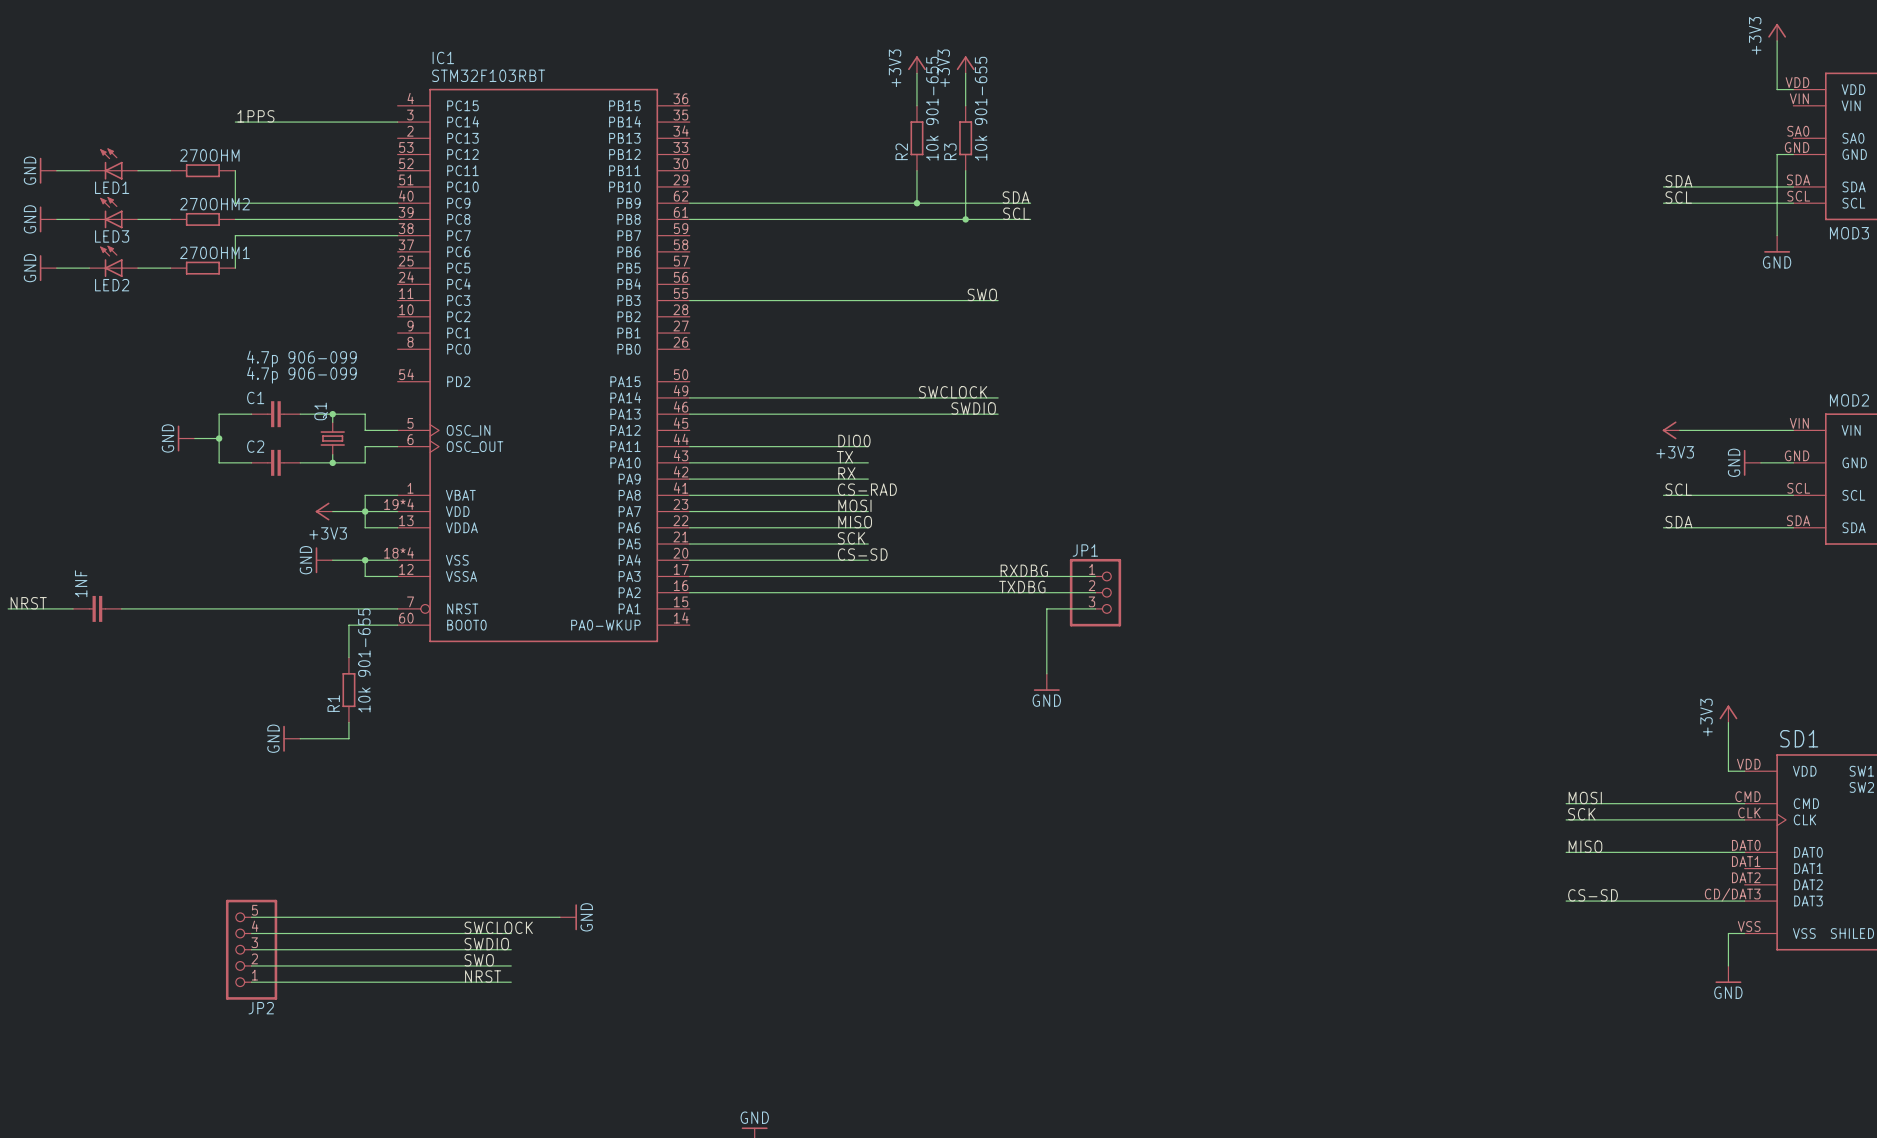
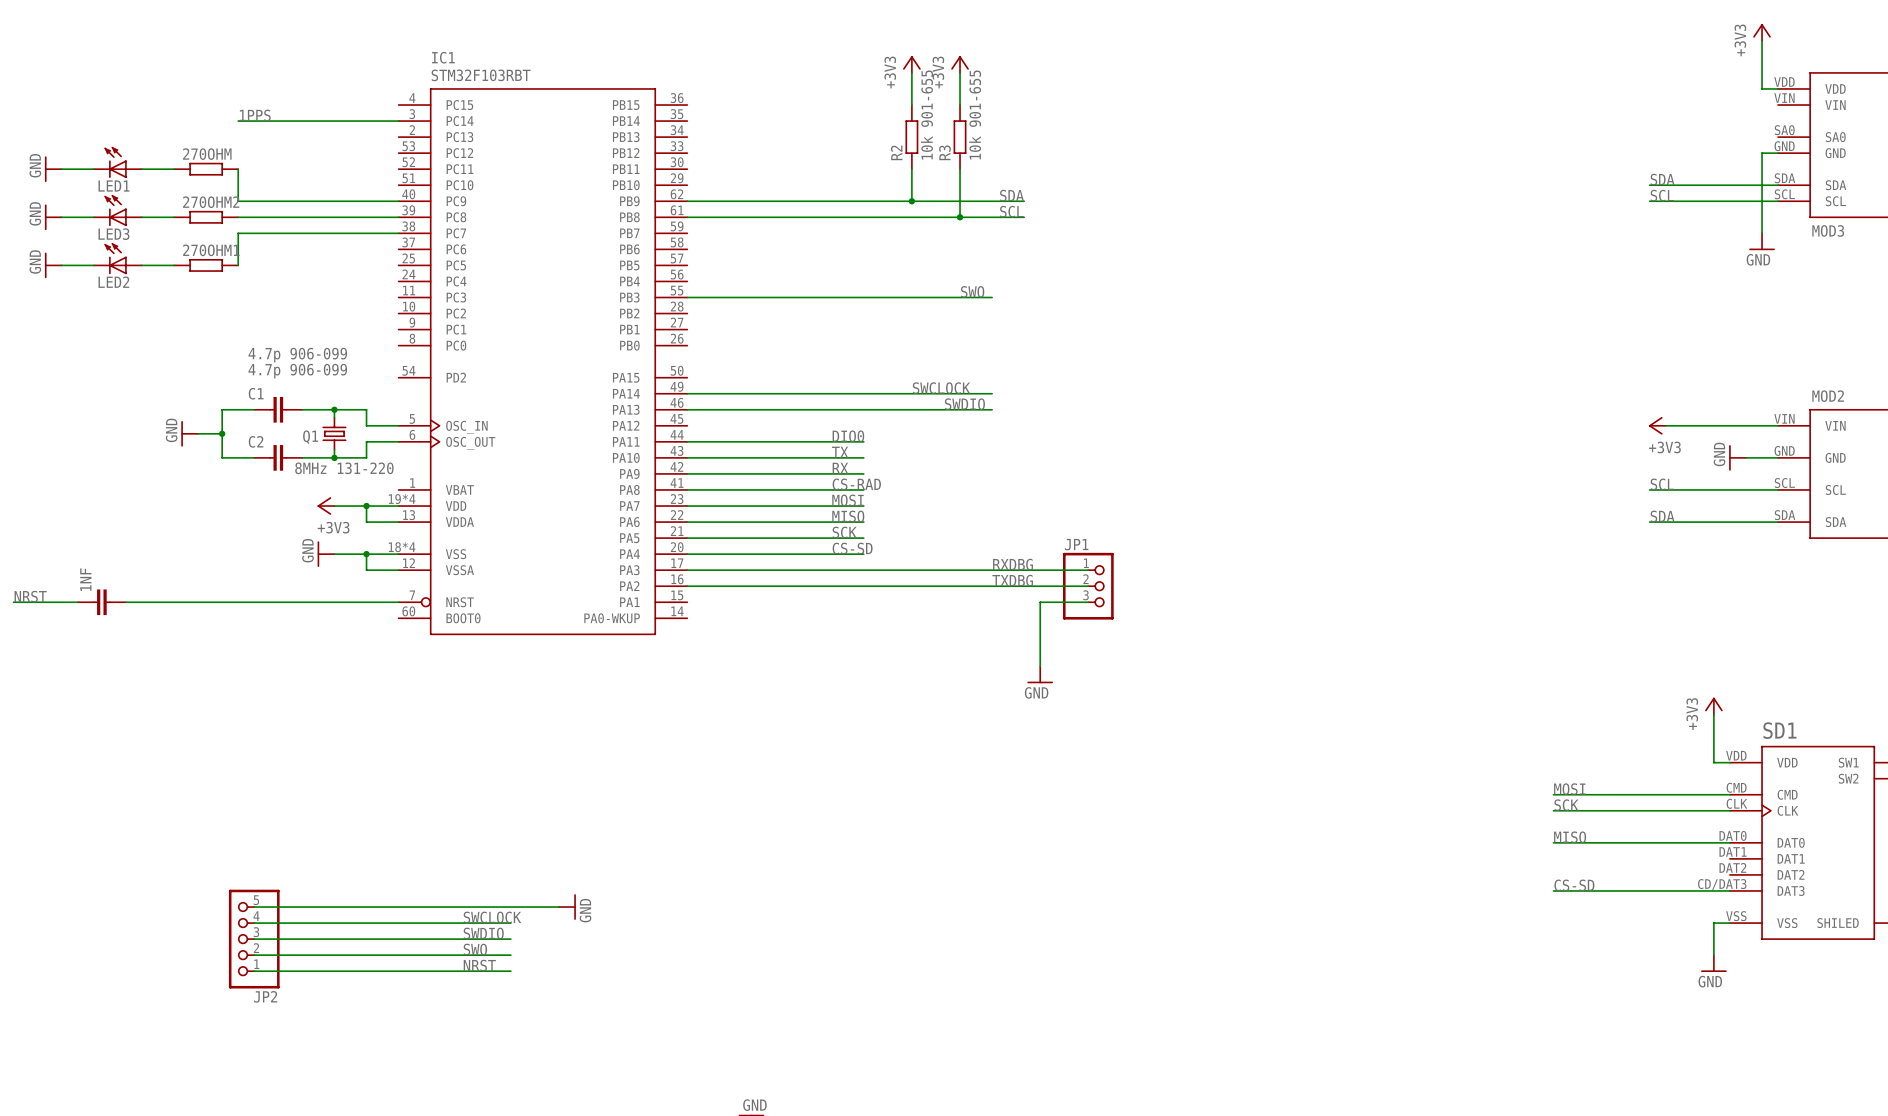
Q1 name rotation: 0° (321, 411) -> 90° clockwise (310, 437)
Q1 name position: Q1 (321, 411) -> Q1 (310, 437)
Q1 value: none -> 8MHz 131-220 (344, 468)
wire: (397, 495) (365, 495) (365, 511) -> none
wire: (397, 625) (348, 625) (348, 657) -> none
R1: 10k 901-655 (348, 690) -> none
wire: (348, 722) (348, 738) (300, 738) -> none
power symbol: GND (291, 738) -> none

